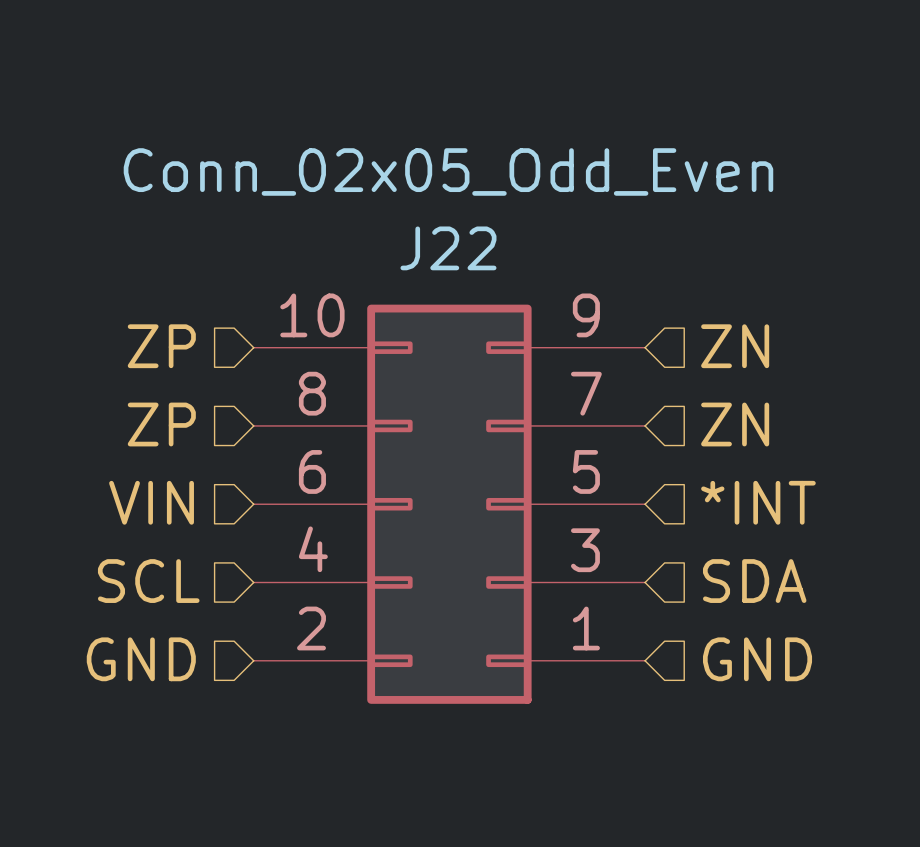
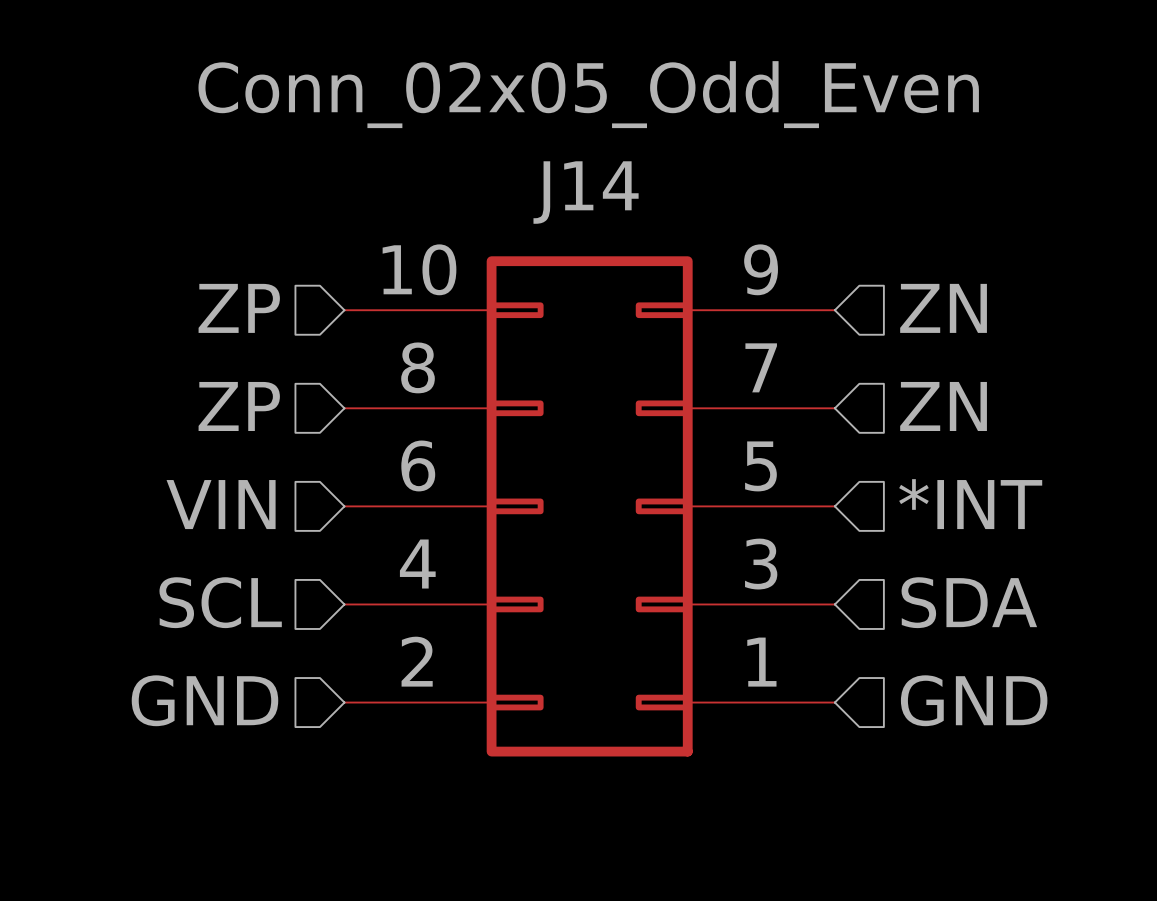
J22 name: J22 (448, 248) -> J14 (586, 192)

